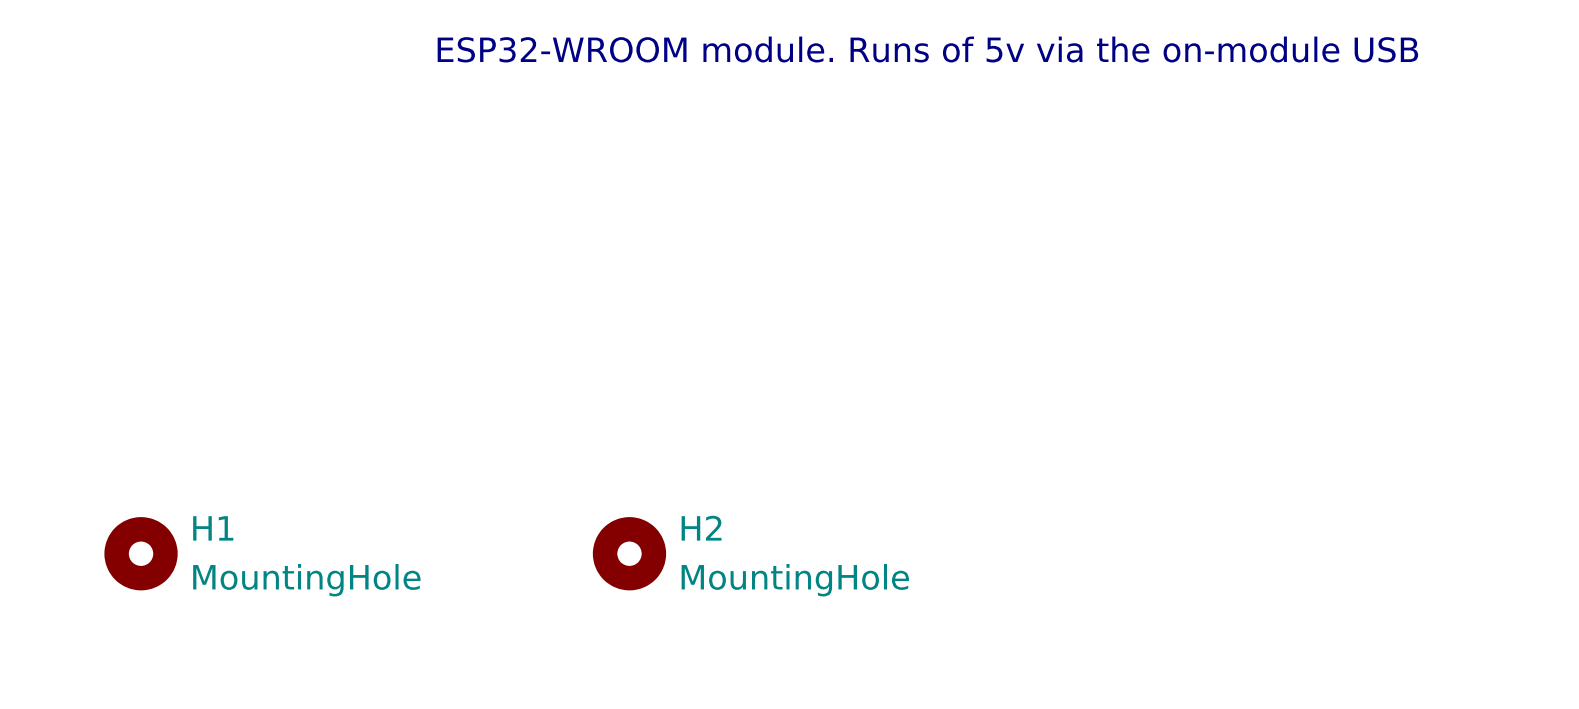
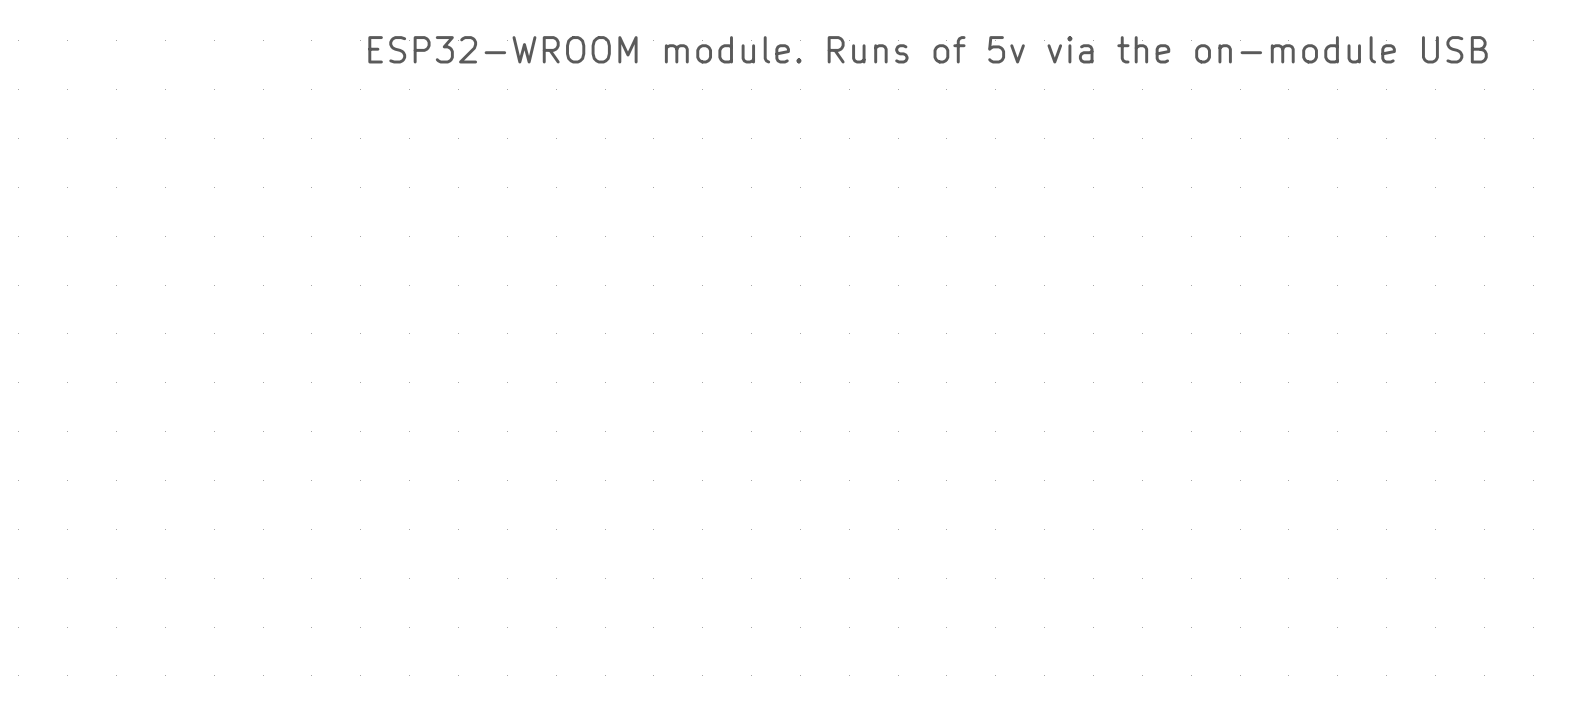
H1: MountingHole (141, 553) -> none
H2: MountingHole (629, 553) -> none

